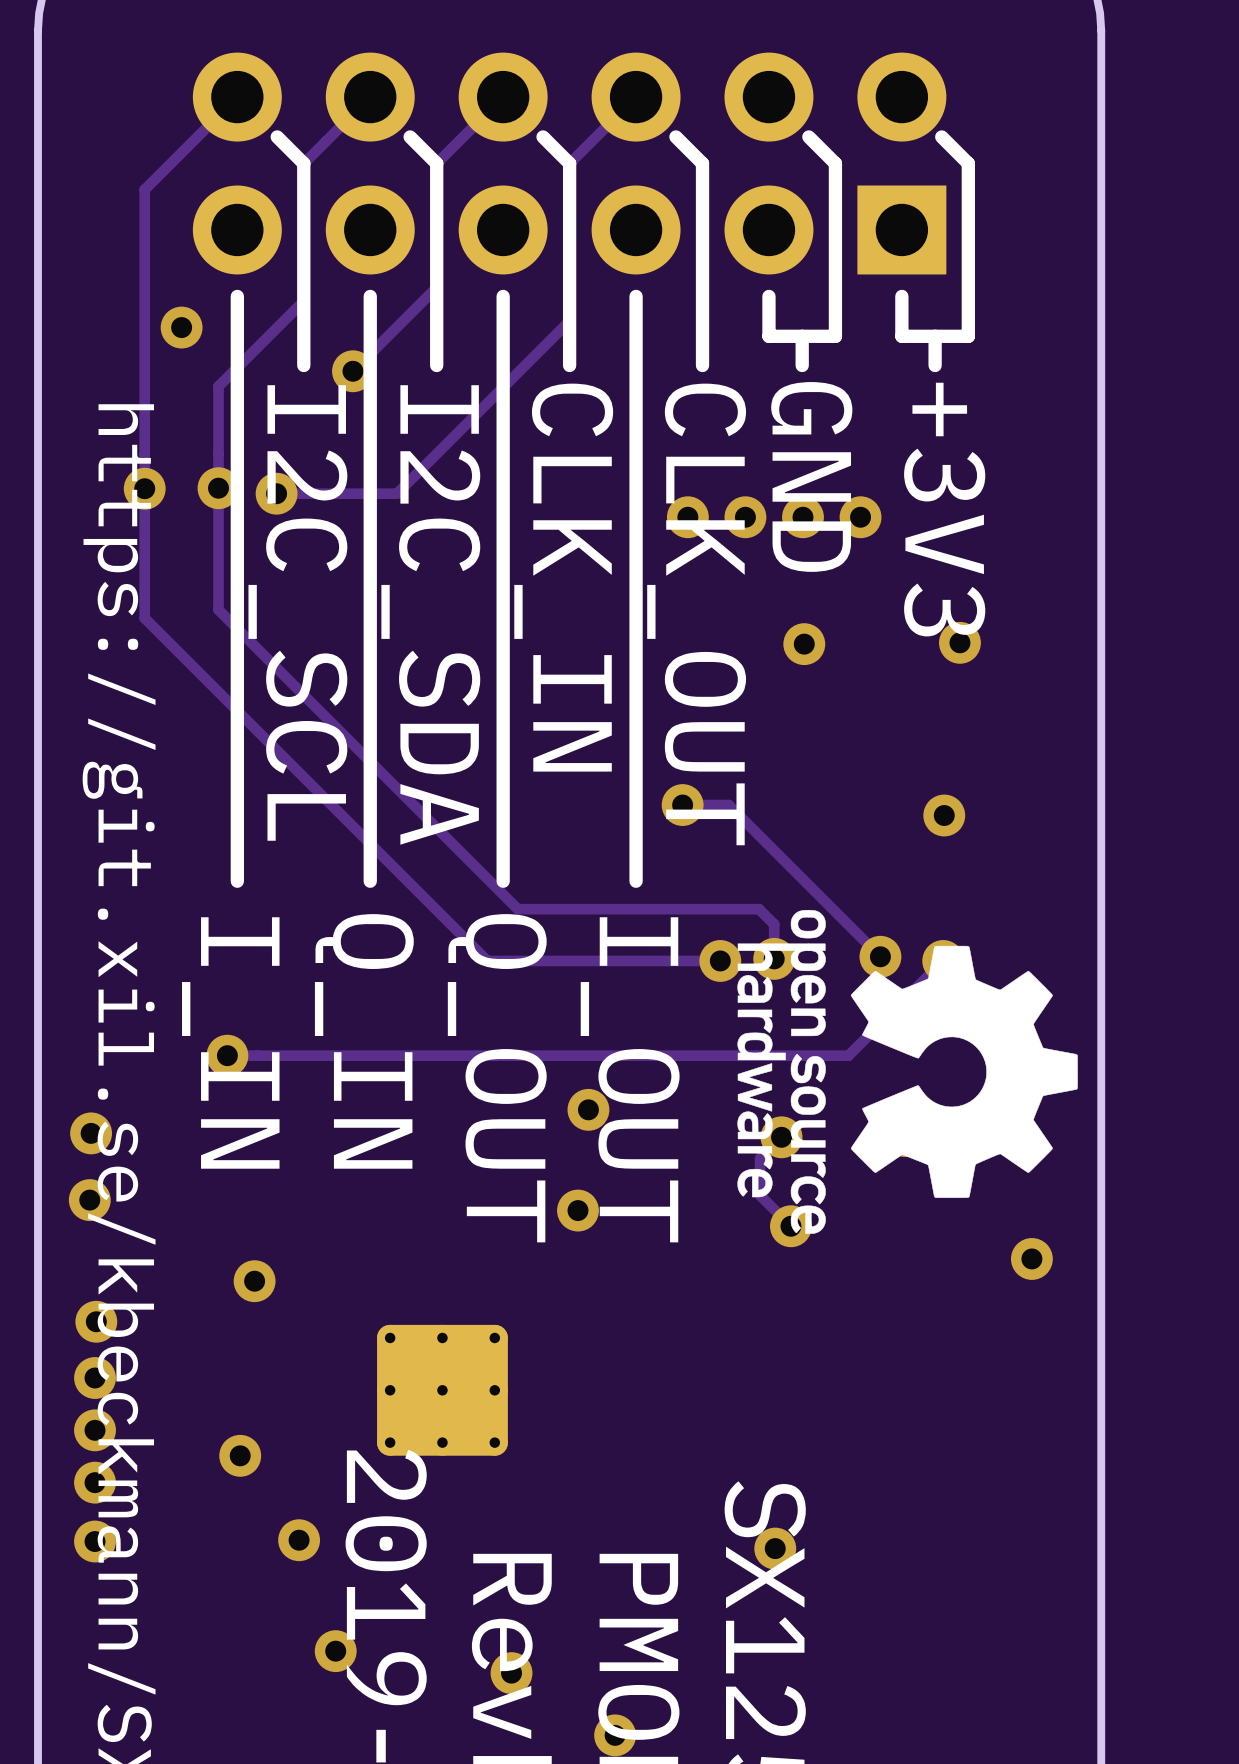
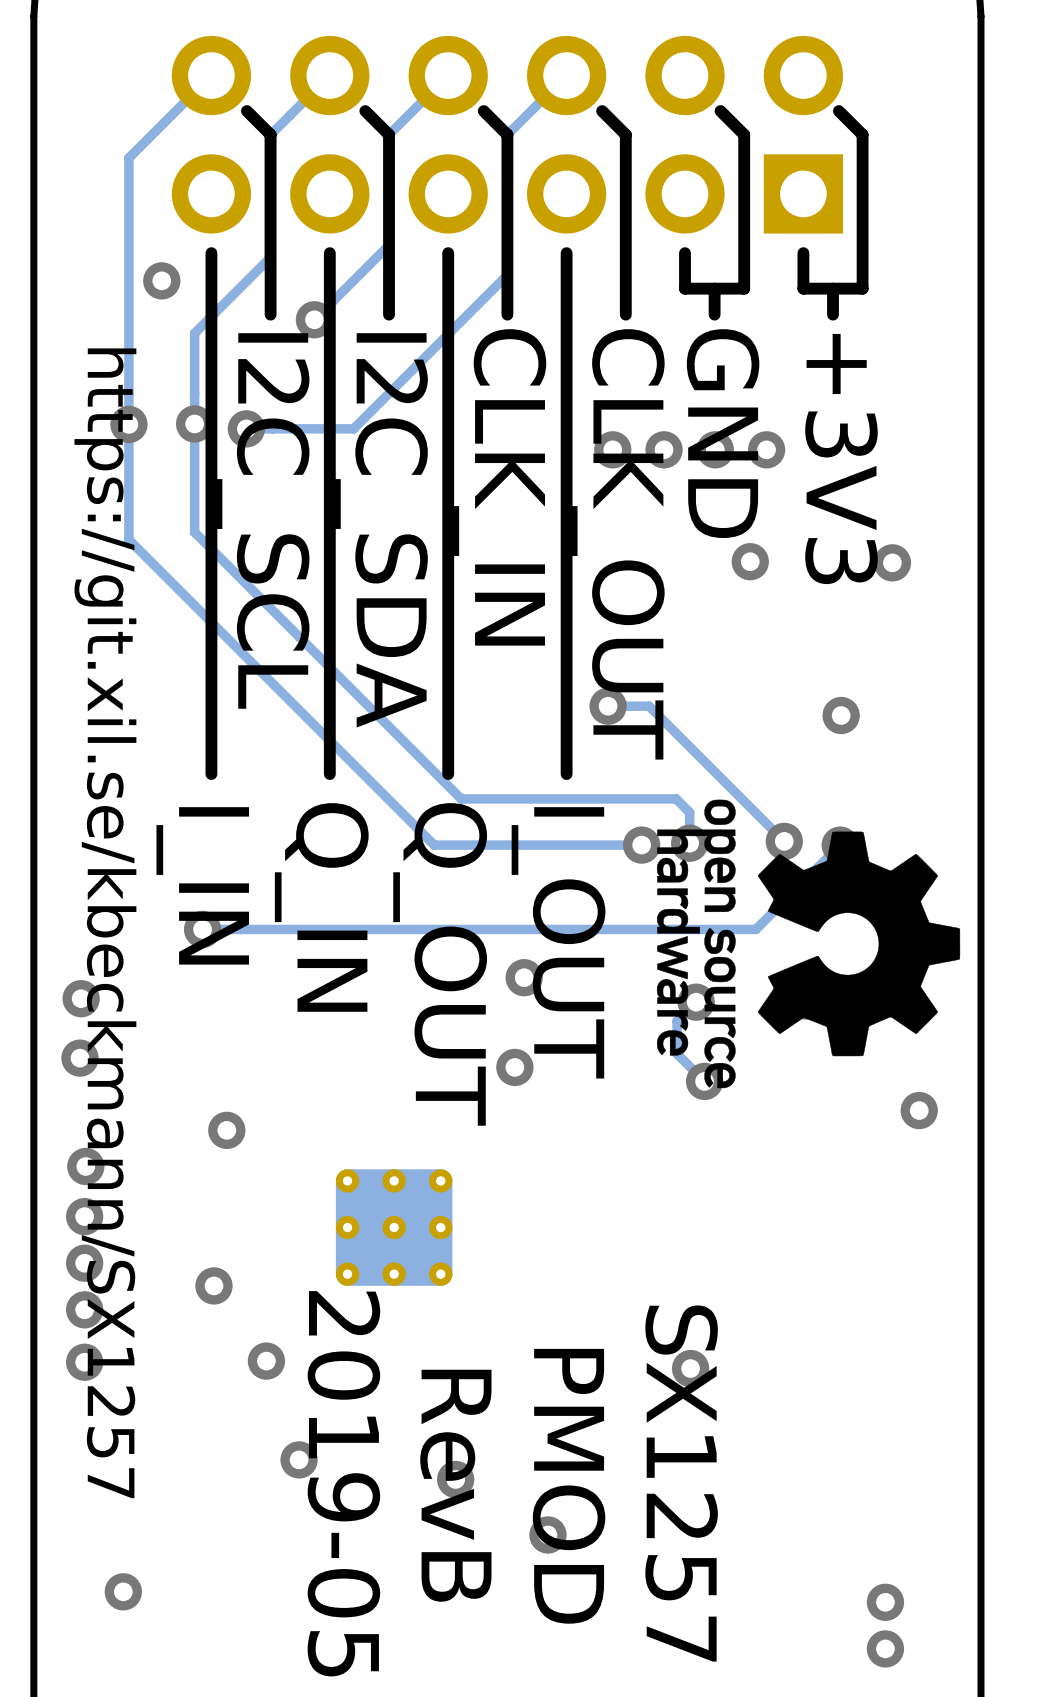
via position: (959, 642) -> (892, 562)
via position: (804, 644) -> (750, 561)

